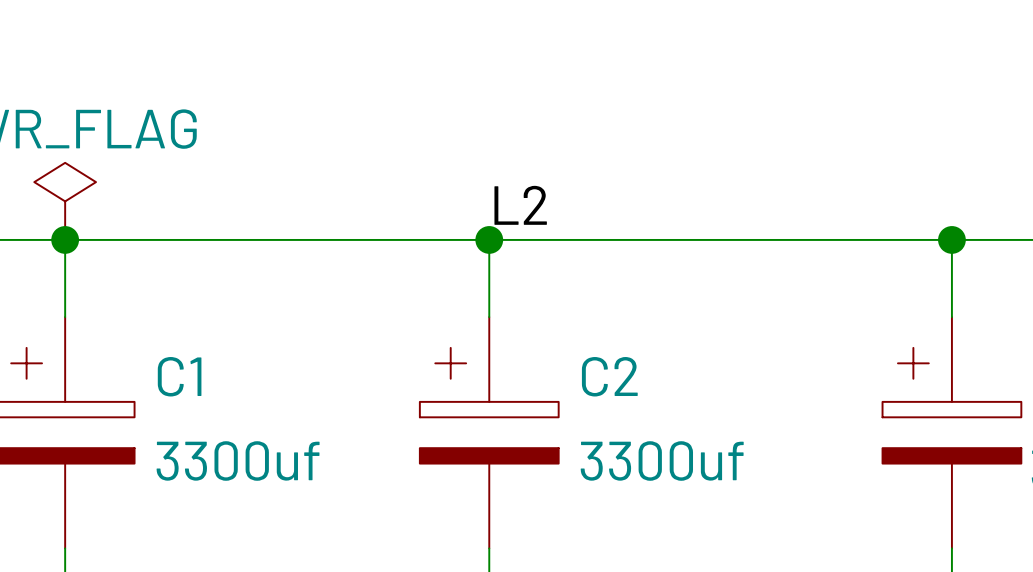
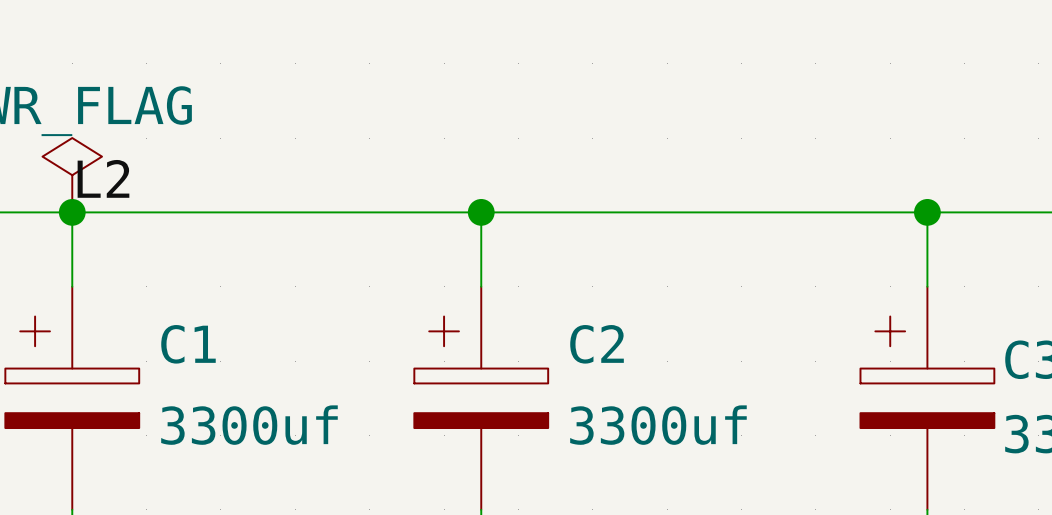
label position: L2 (520, 205) -> L2 (103, 178)

